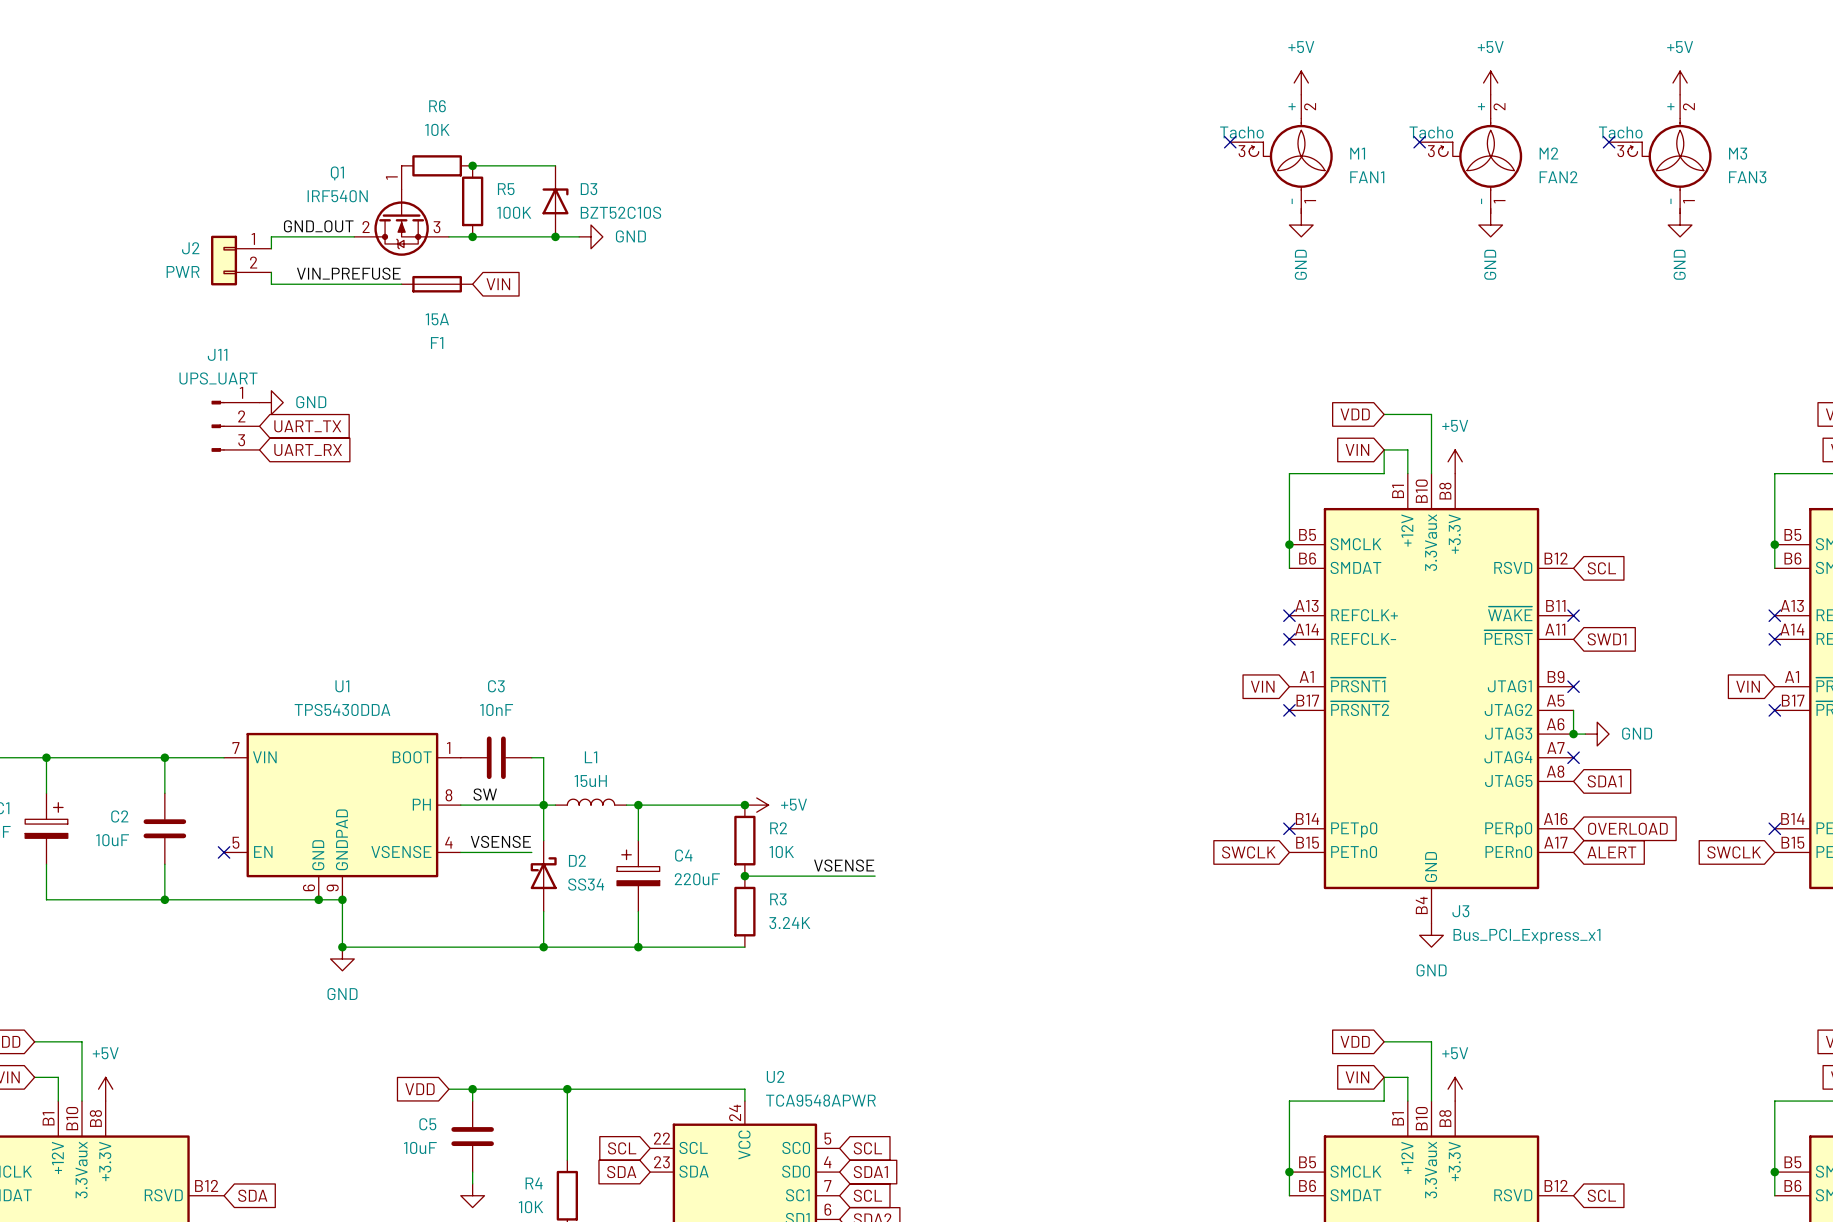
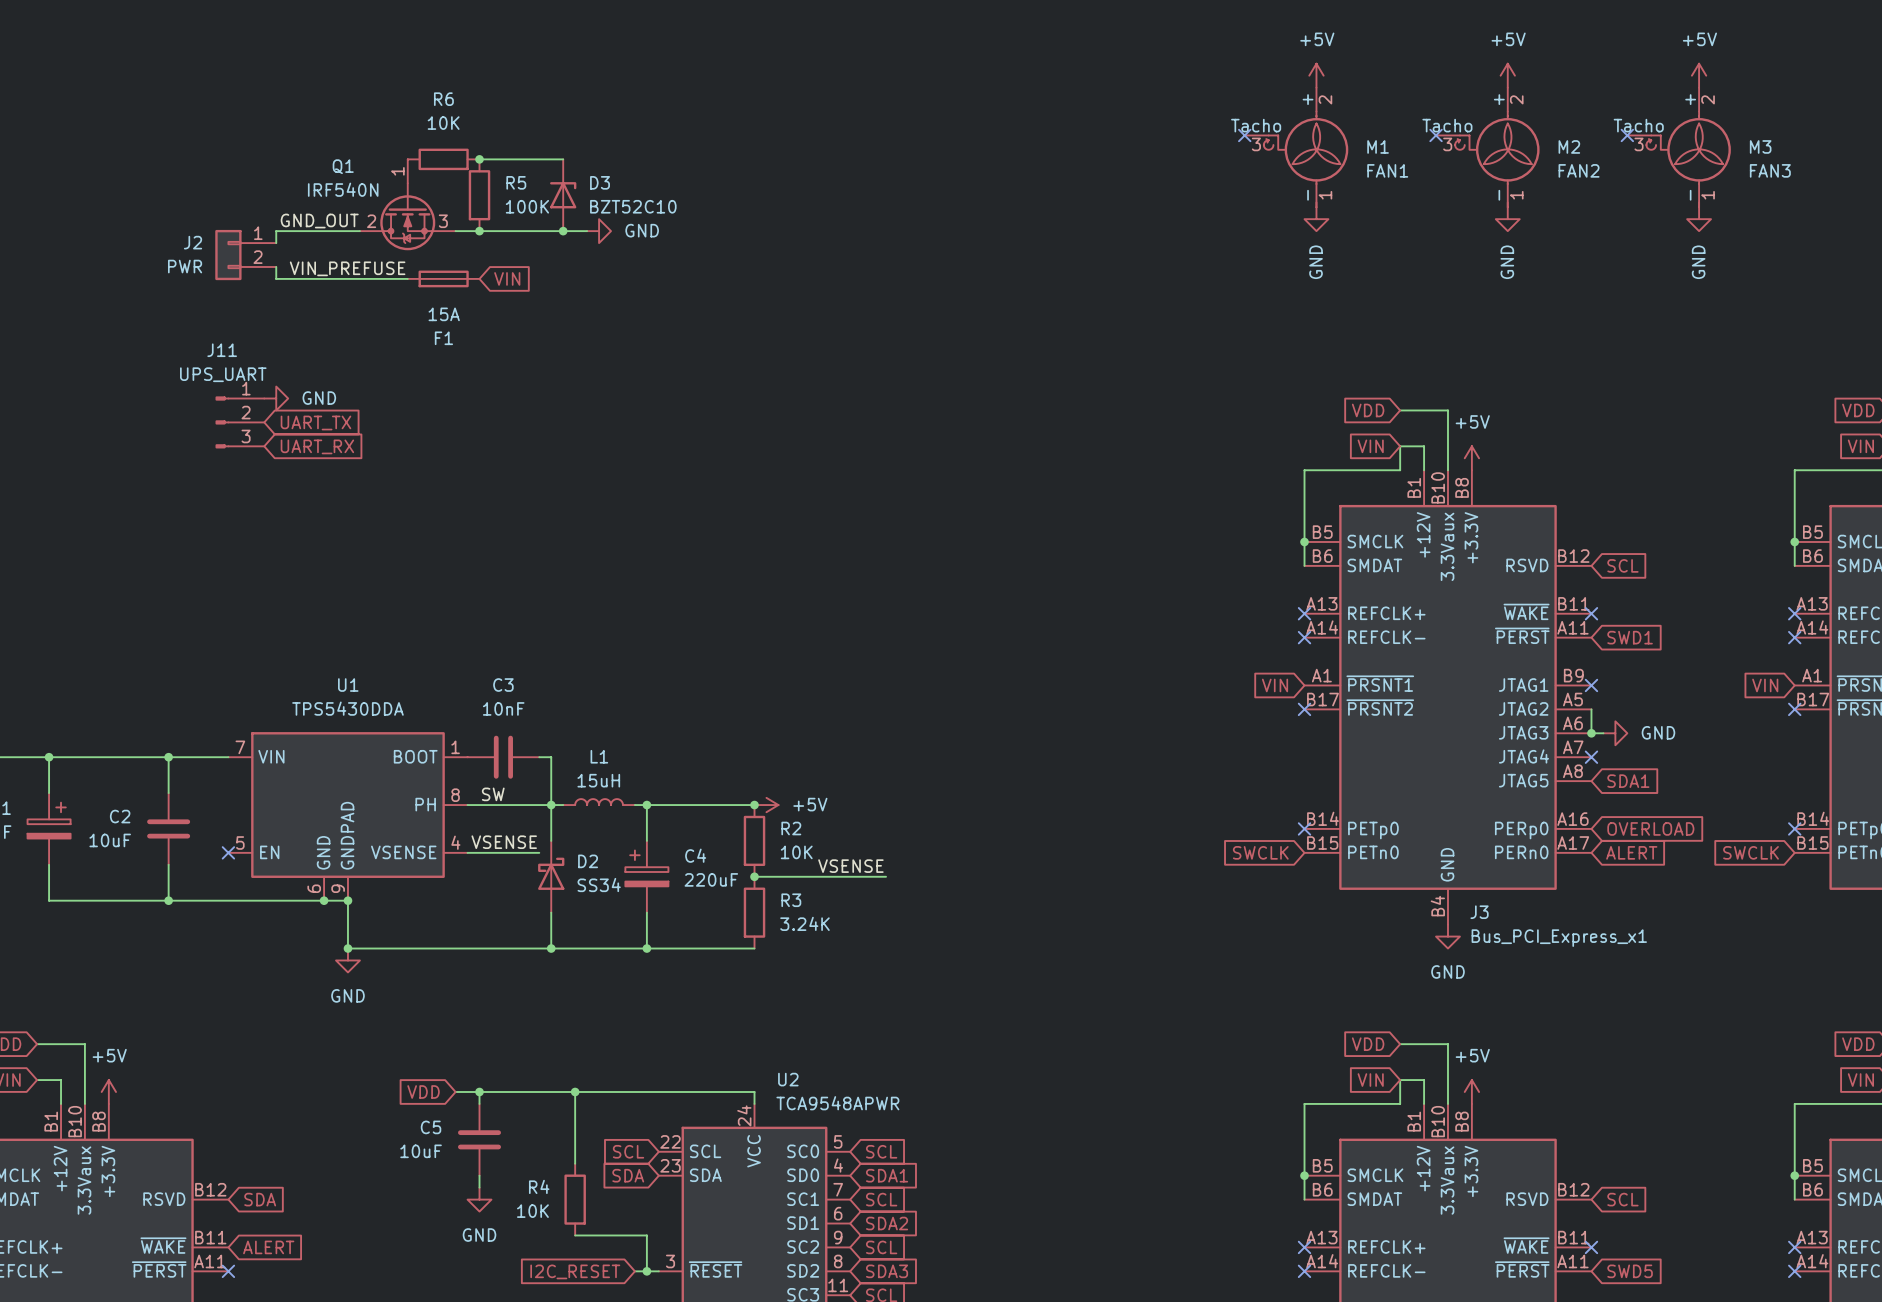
D3 value: BZT52C10S (620, 212) -> BZT52C10 (633, 206)

